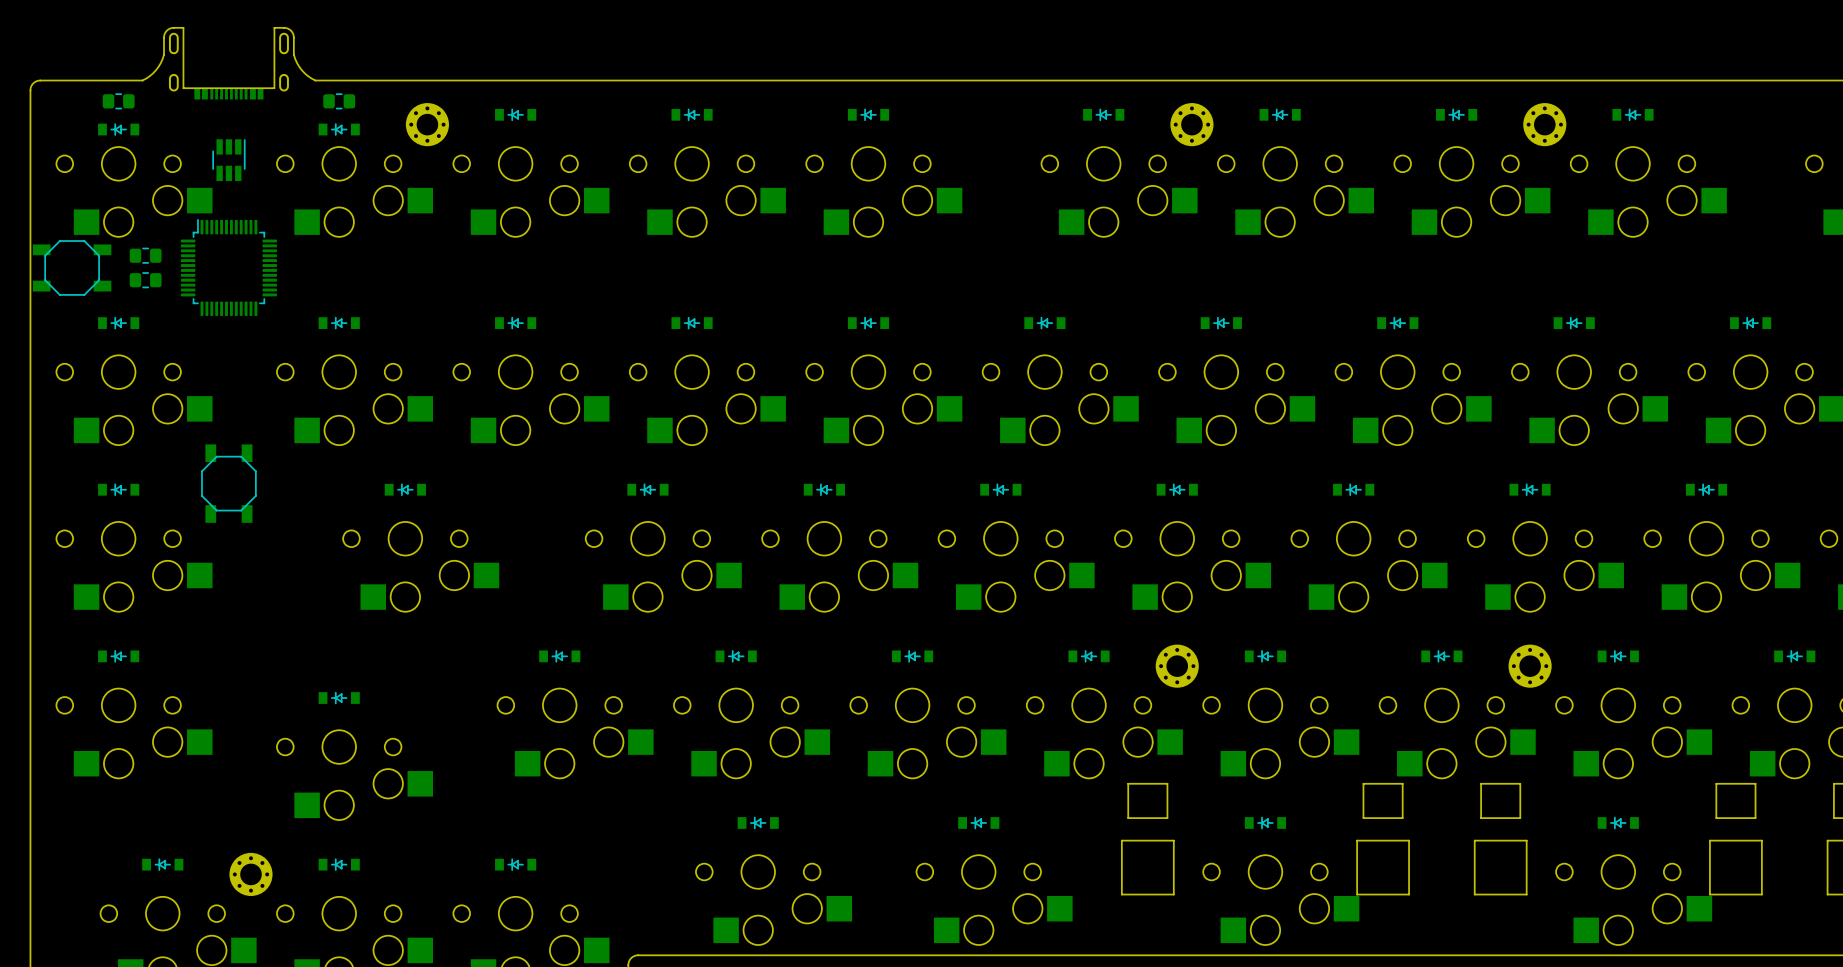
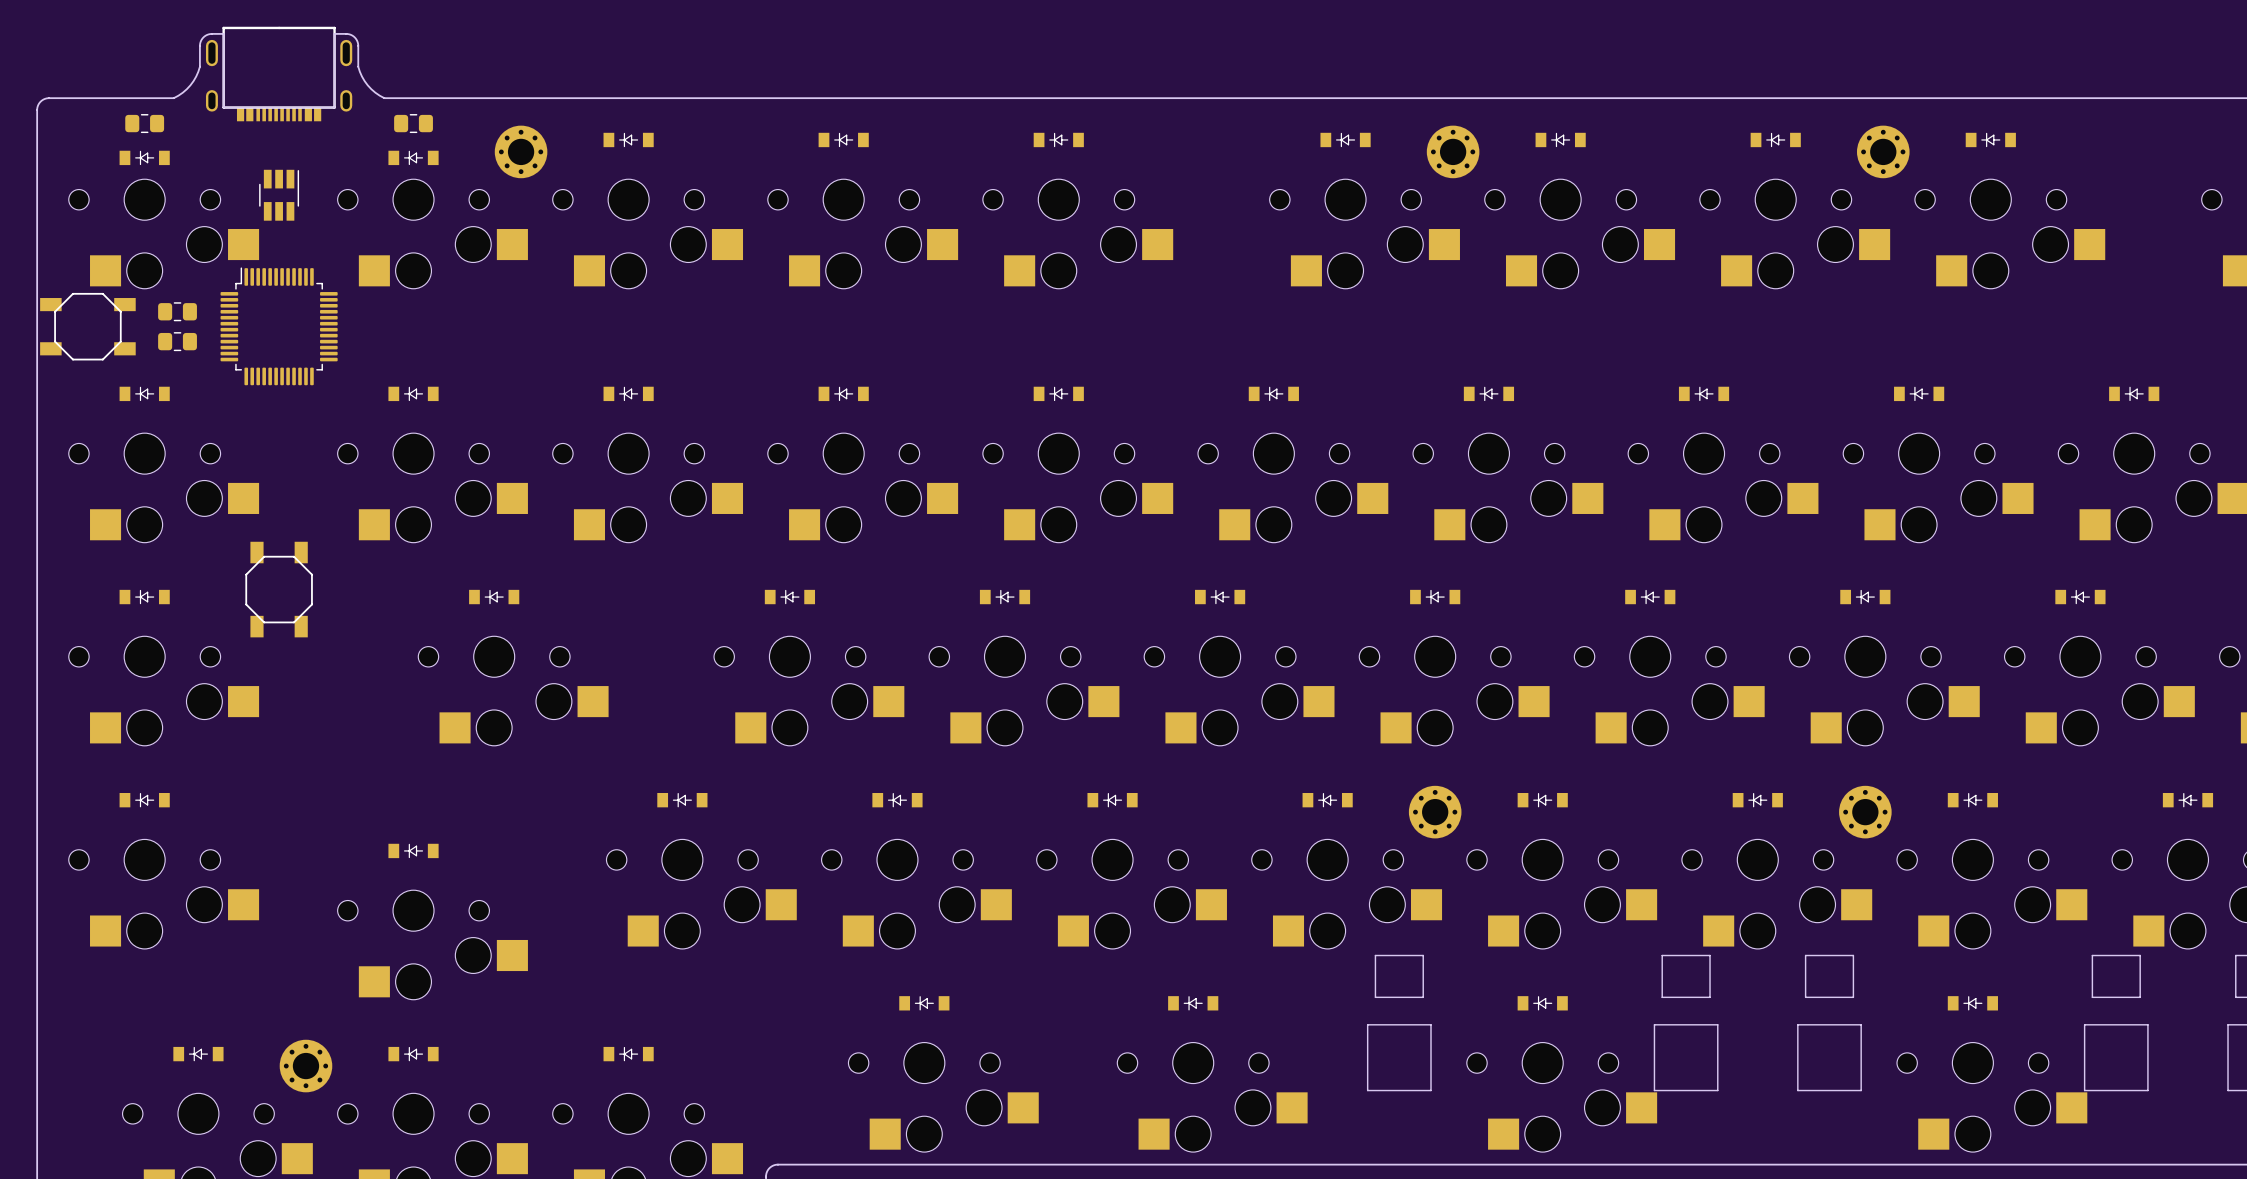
part footprint: [168, 32, 289, 100] -> [205, 26, 353, 122]

